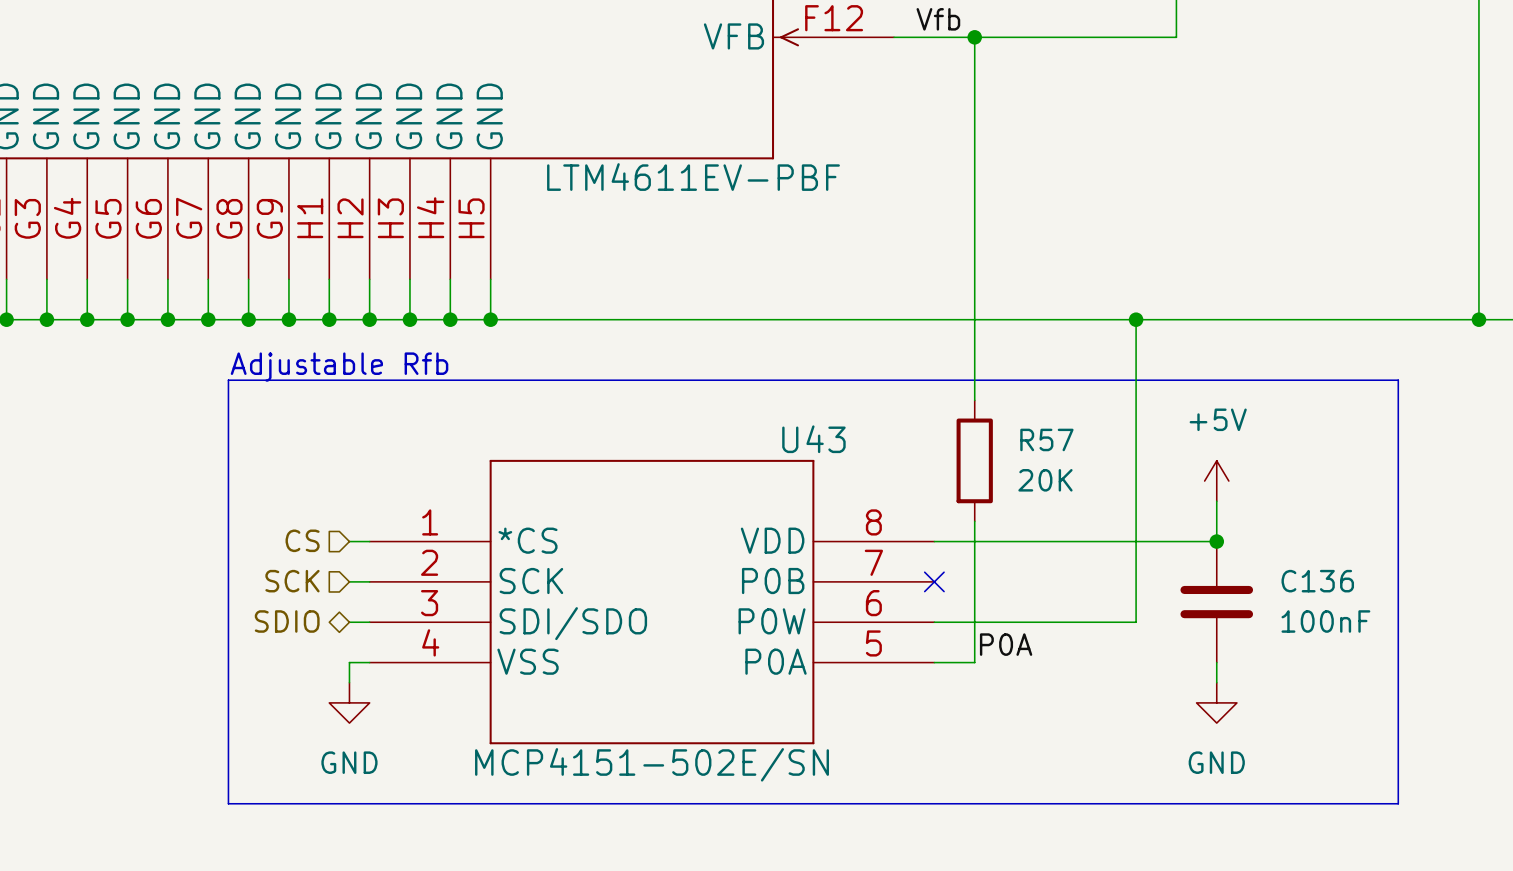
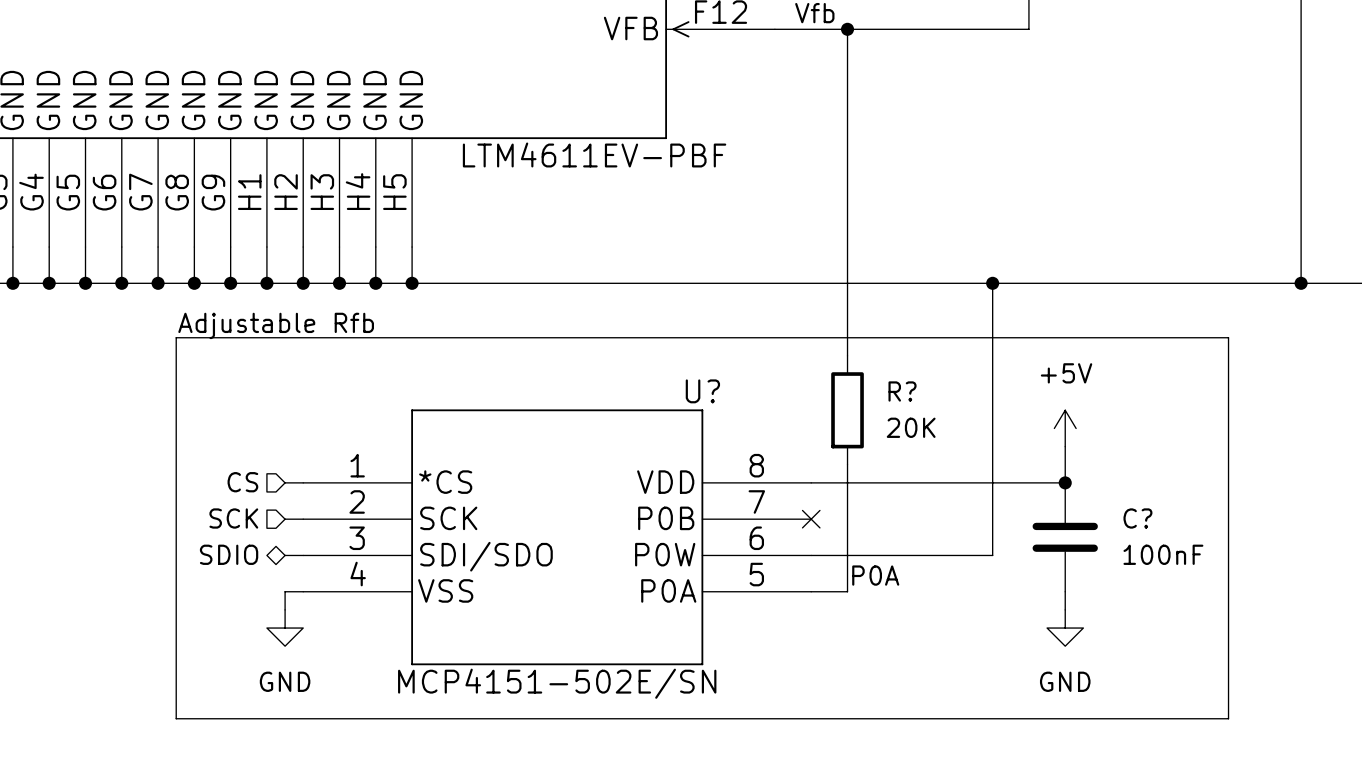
U43 name: U43 (813, 439) -> U? (702, 391)
R57 name: R57 (1046, 439) -> R? (902, 391)
C136 name: C136 (1317, 581) -> C? (1137, 518)

